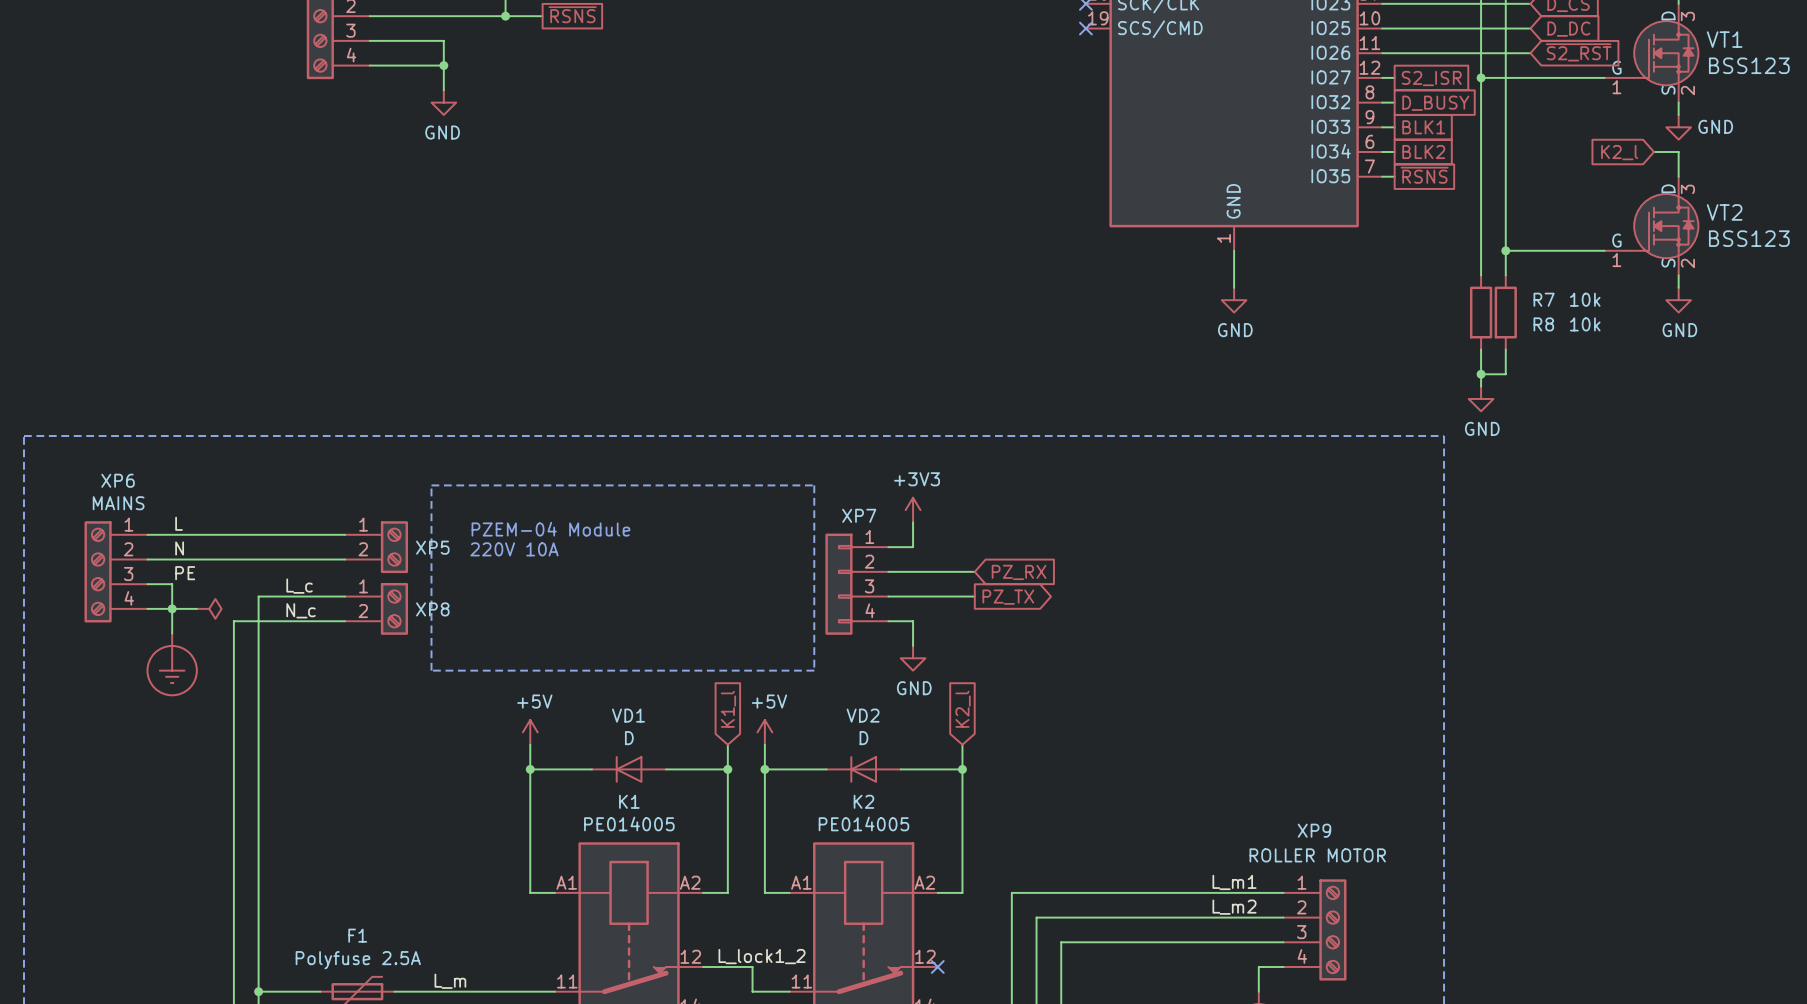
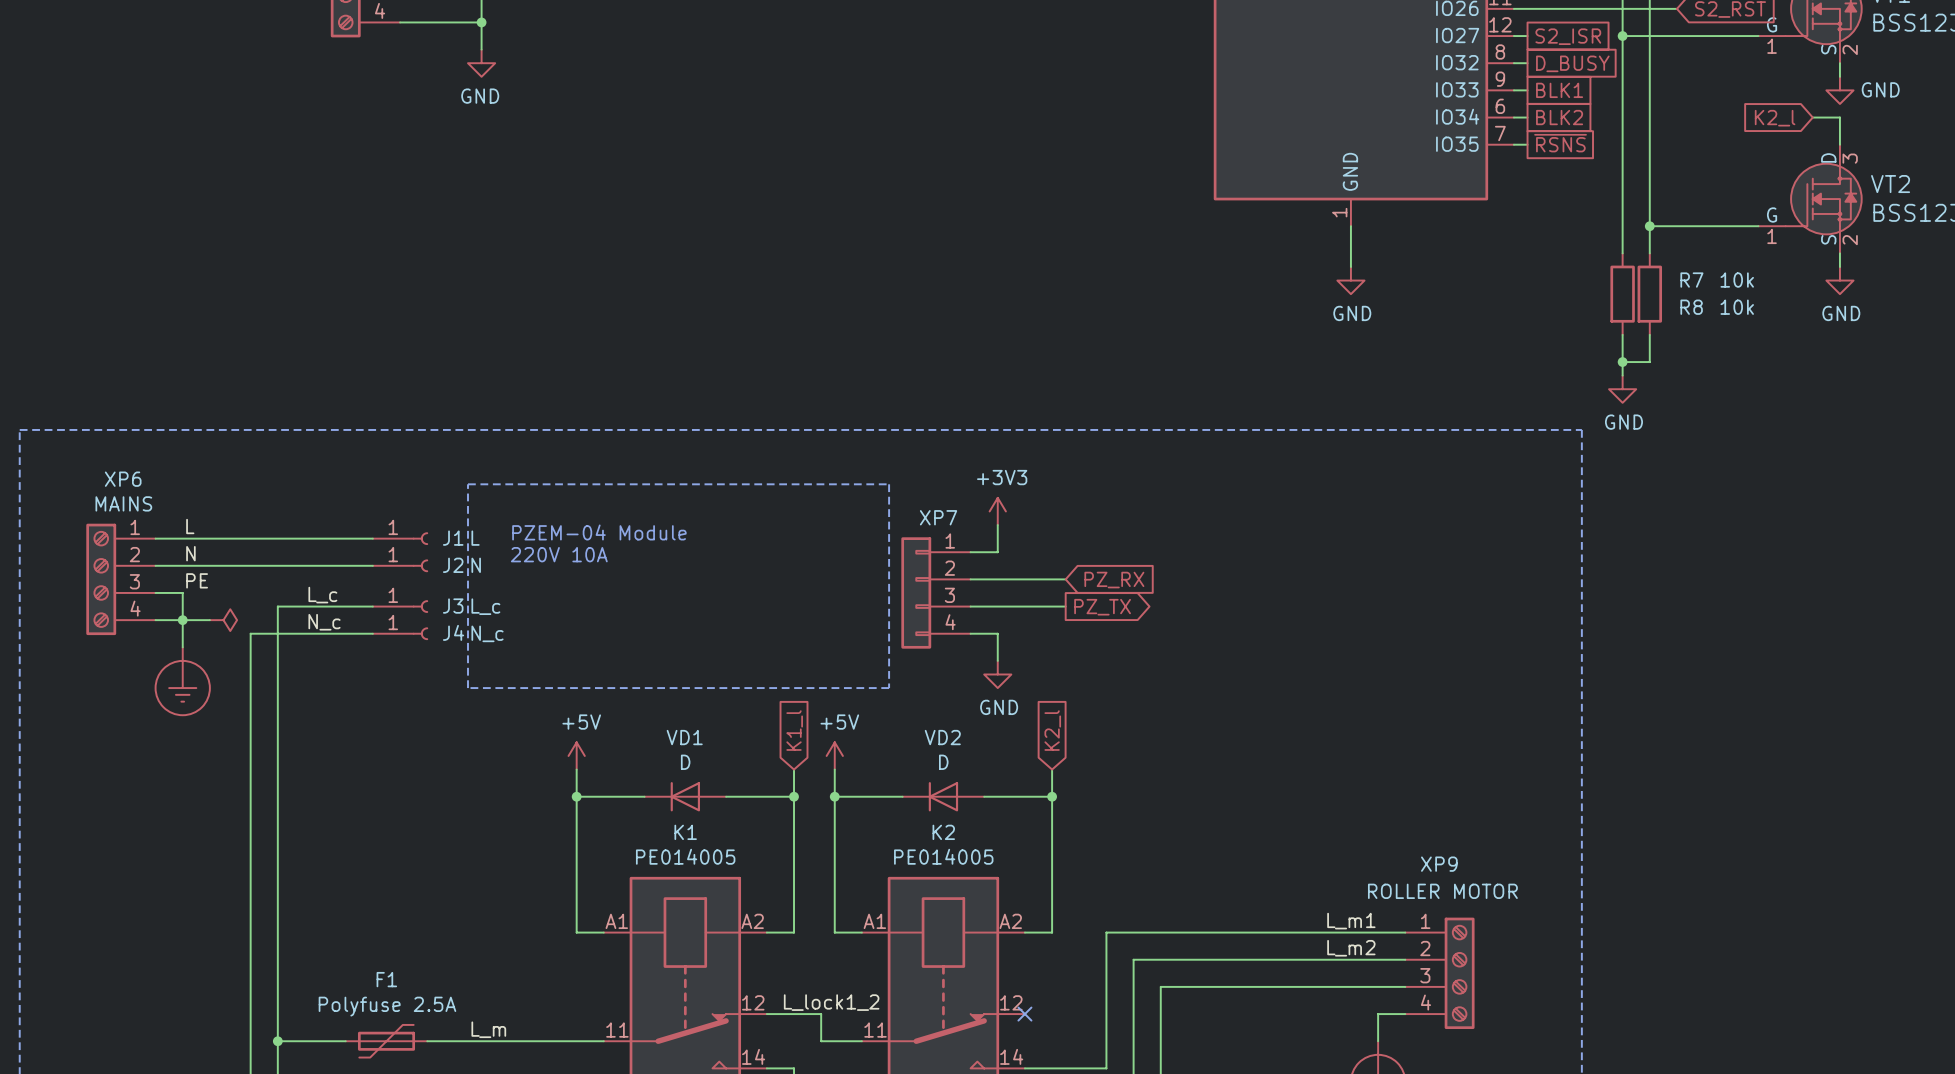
J1: none -> L (400, 538)
XP5: (376, 547) -> none
J2: none -> N (400, 565)
J3: none -> L_c (400, 606)
XP8: (376, 608) -> none
J4: none -> N_c (400, 633)

